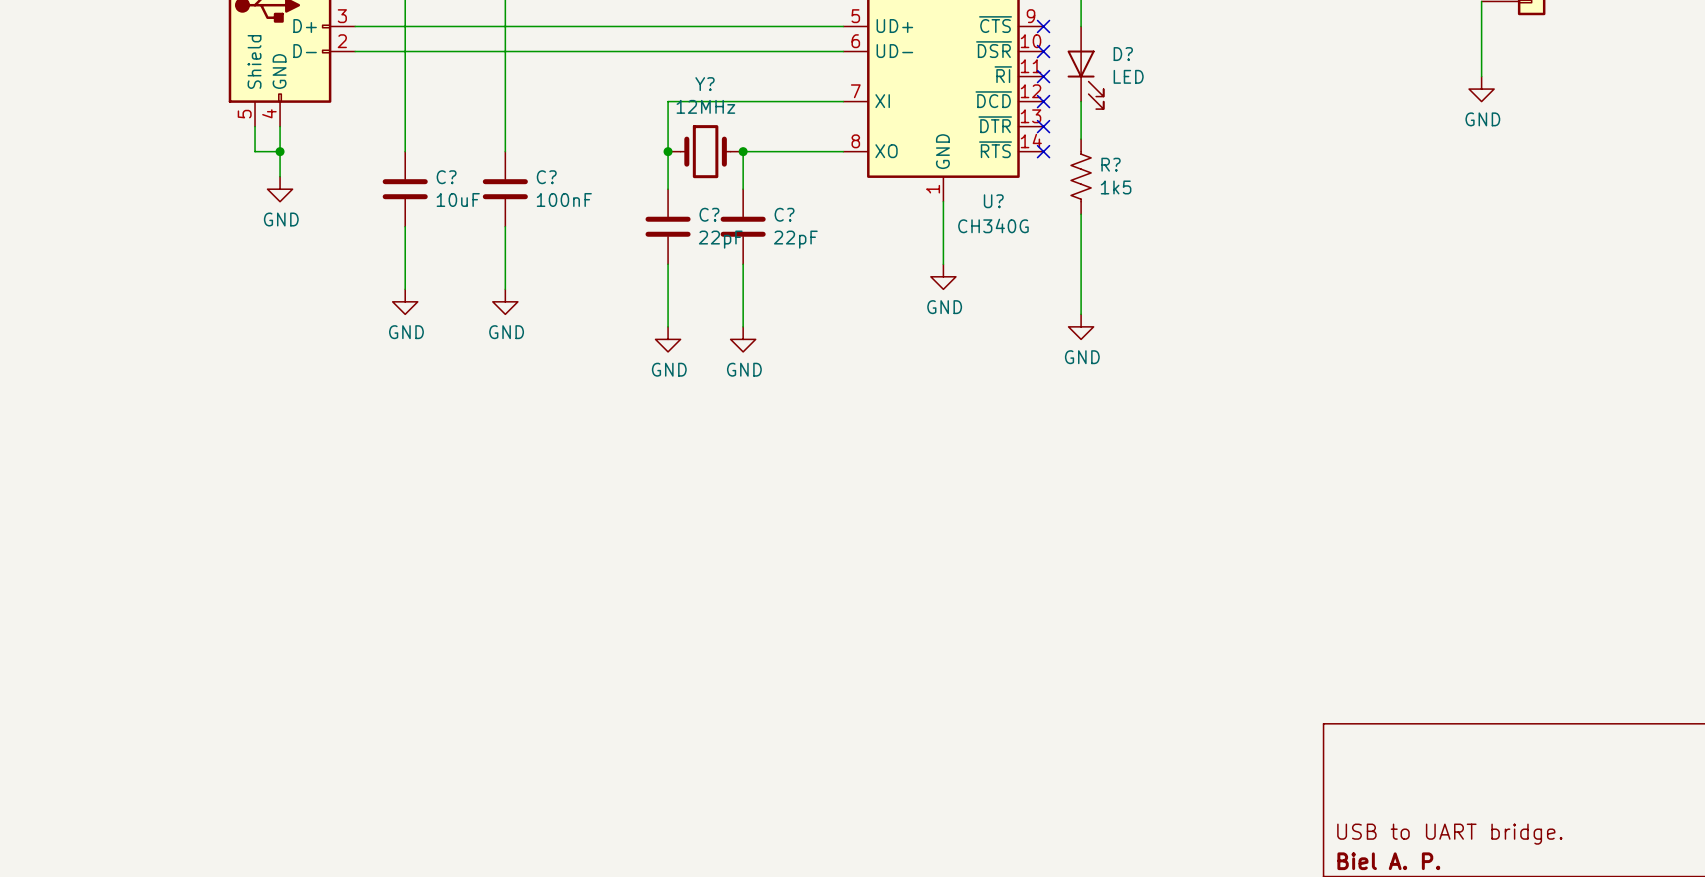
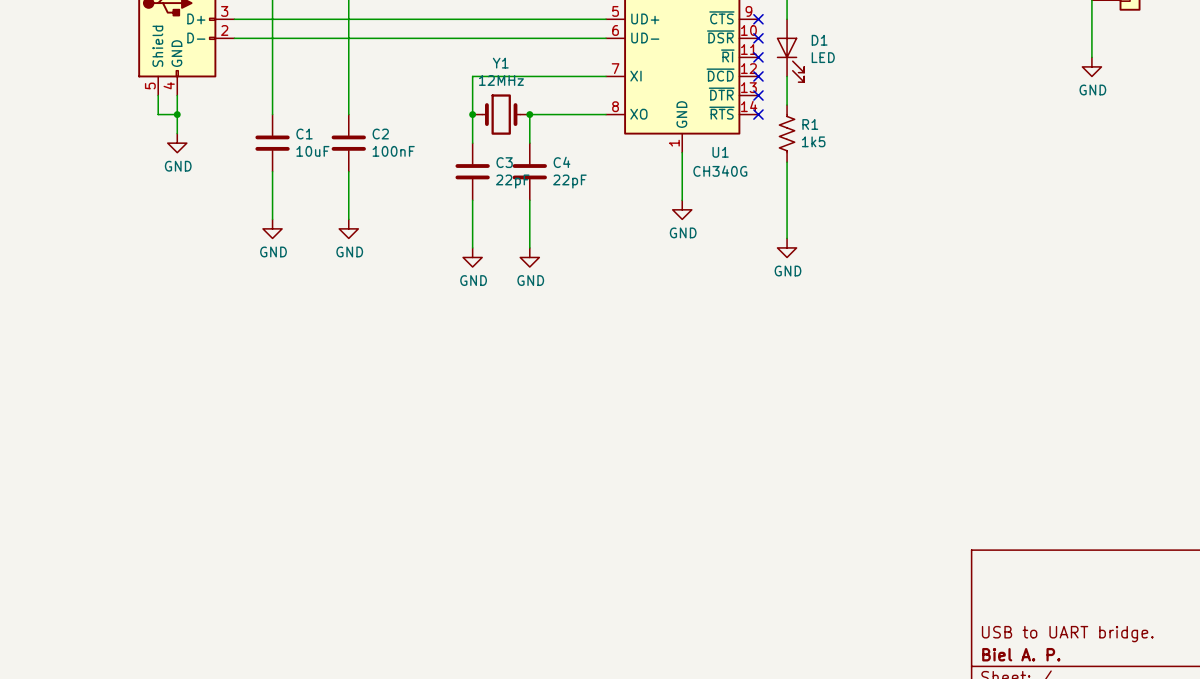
D? name: D? (1123, 54) -> D1 (819, 40)
Y? name: Y? (705, 84) -> Y1 (500, 63)
R? name: R? (1111, 164) -> R1 (810, 124)
C? name: C? (446, 177) -> C1 (304, 134)
C? name: C? (546, 177) -> C2 (380, 134)
U? name: U? (993, 201) -> U1 (720, 152)
C? name: C? (709, 214) -> C3 (504, 162)
C? name: C? (784, 214) -> C4 (561, 162)

